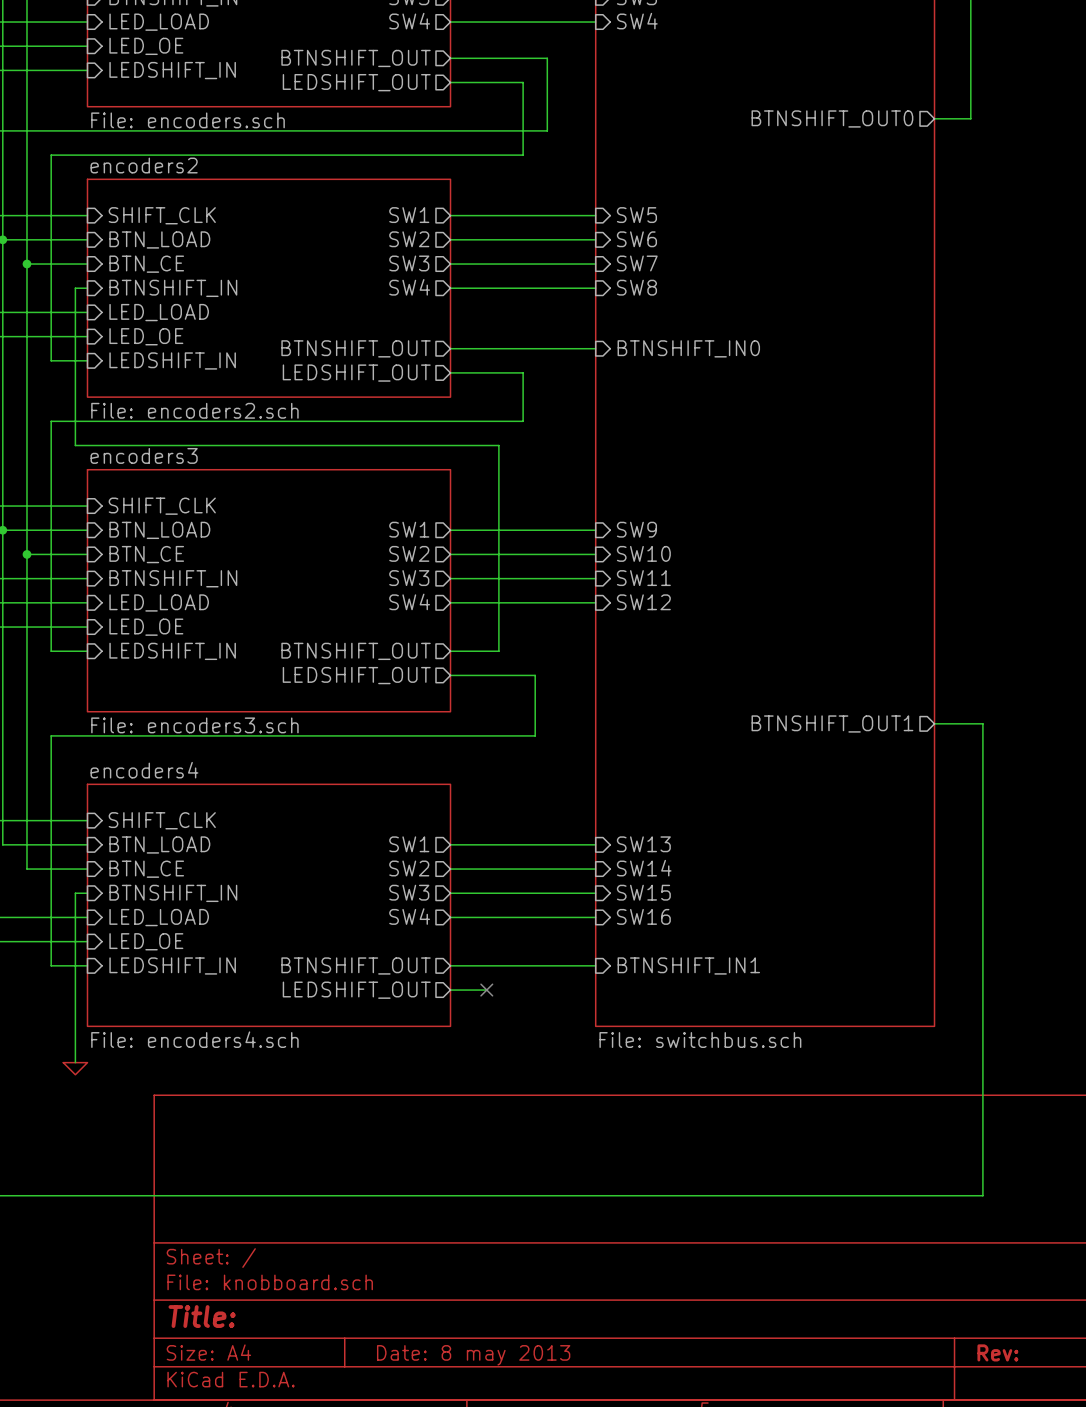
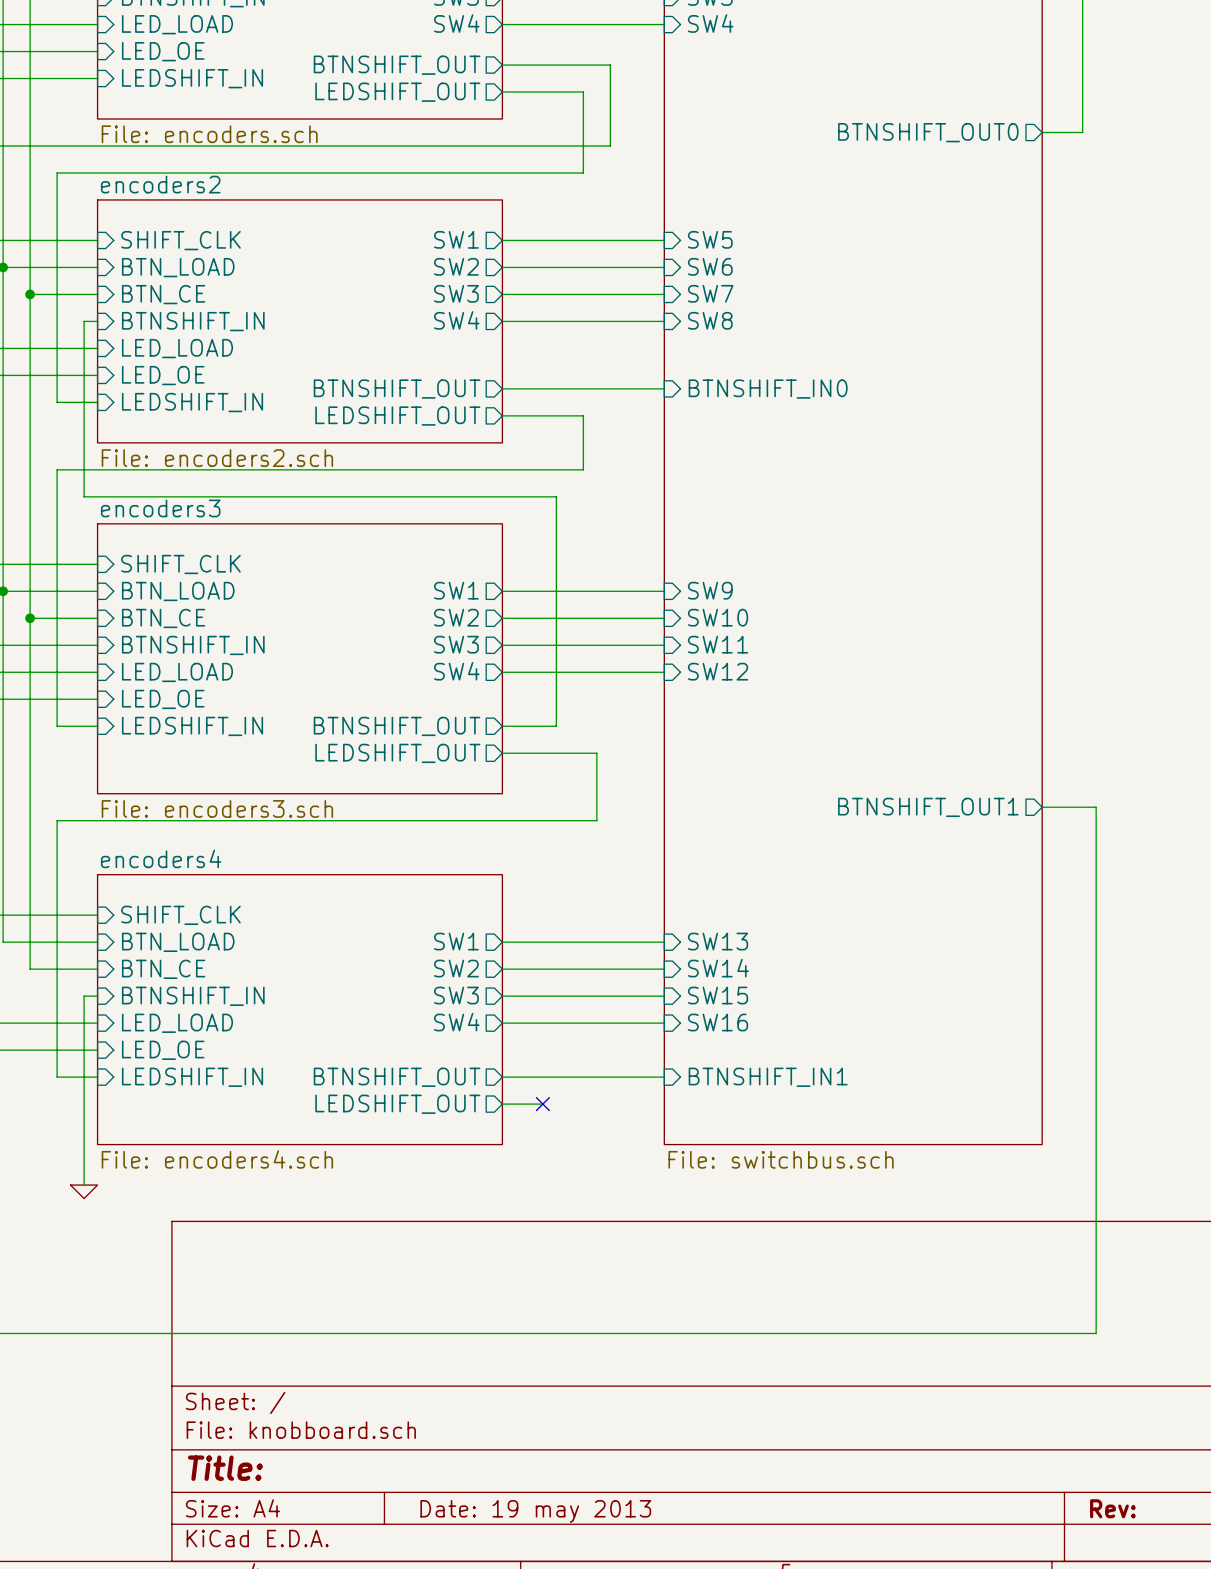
title block: Date: 8 may 2013 (473, 1355) -> Date: 19 may 2013 (535, 1511)

